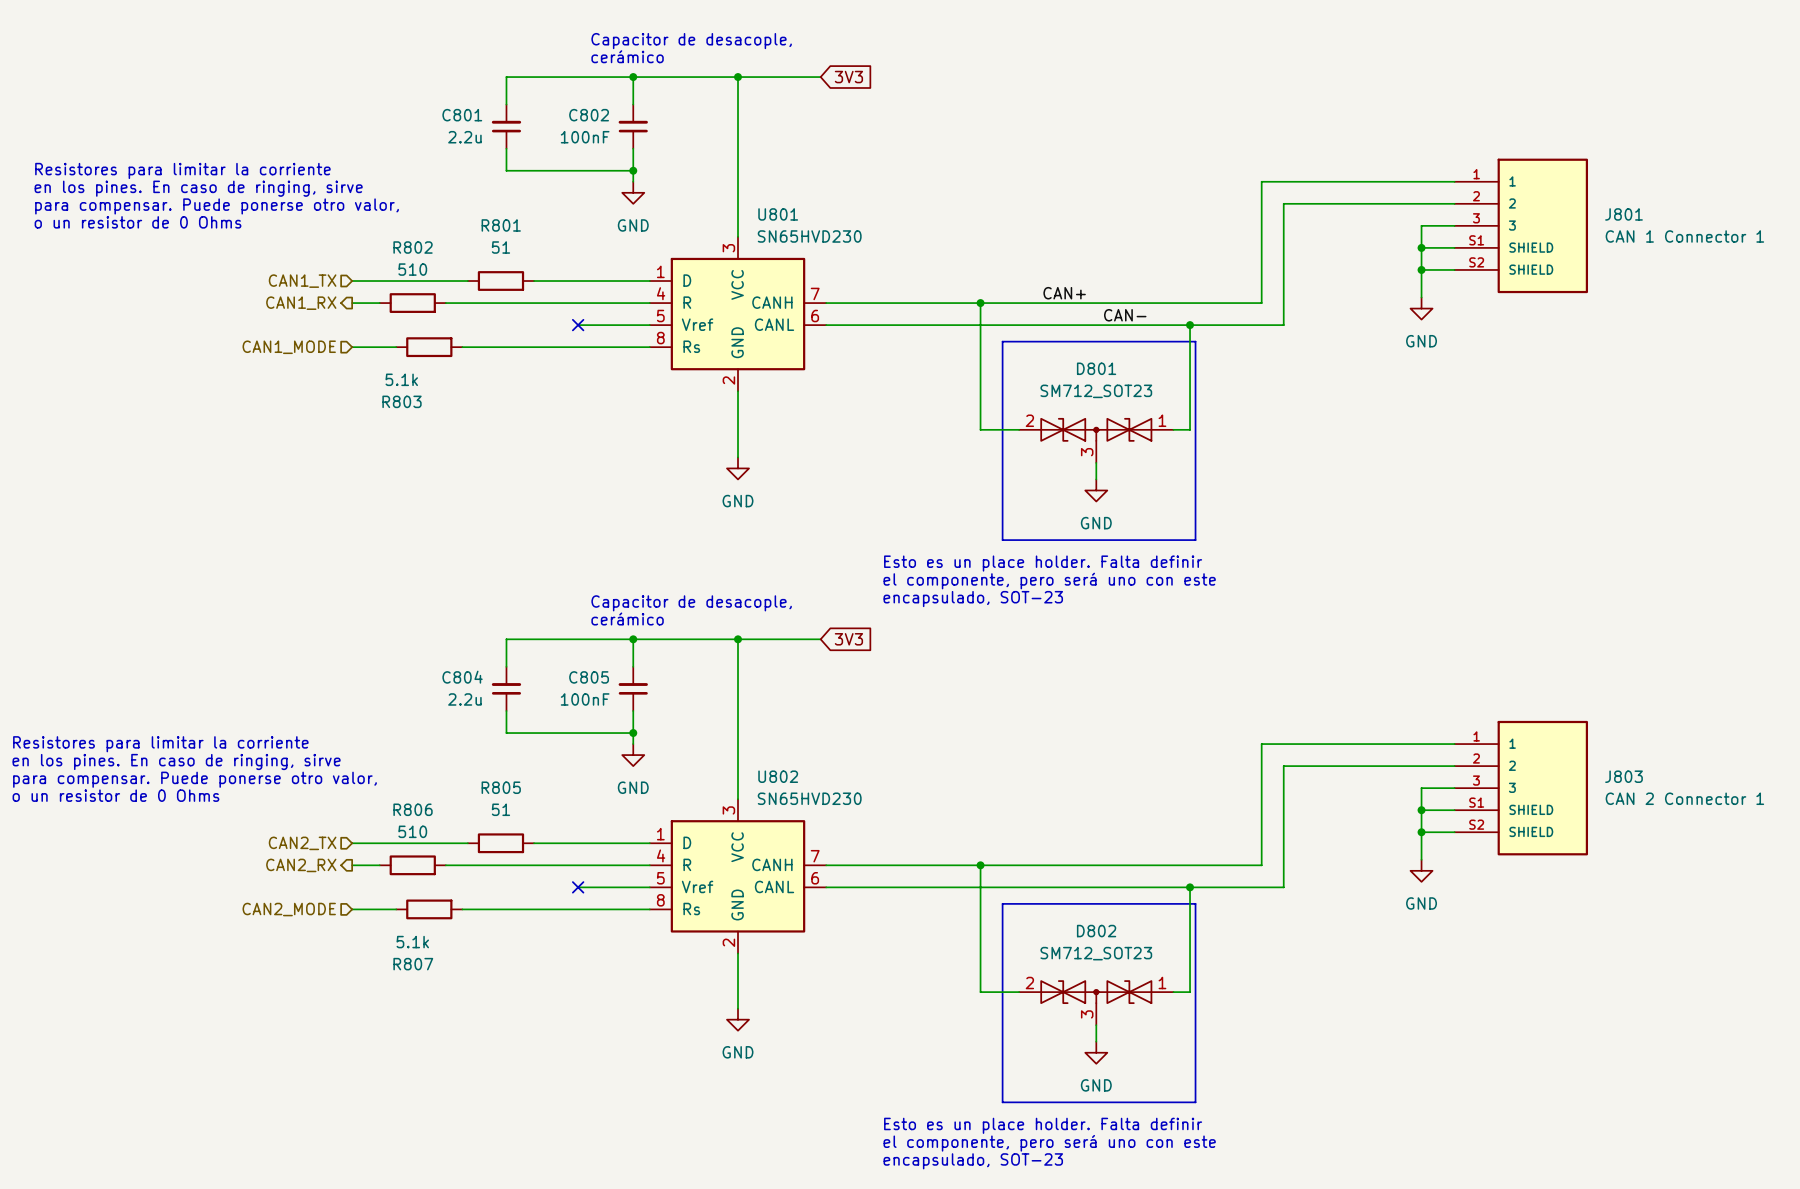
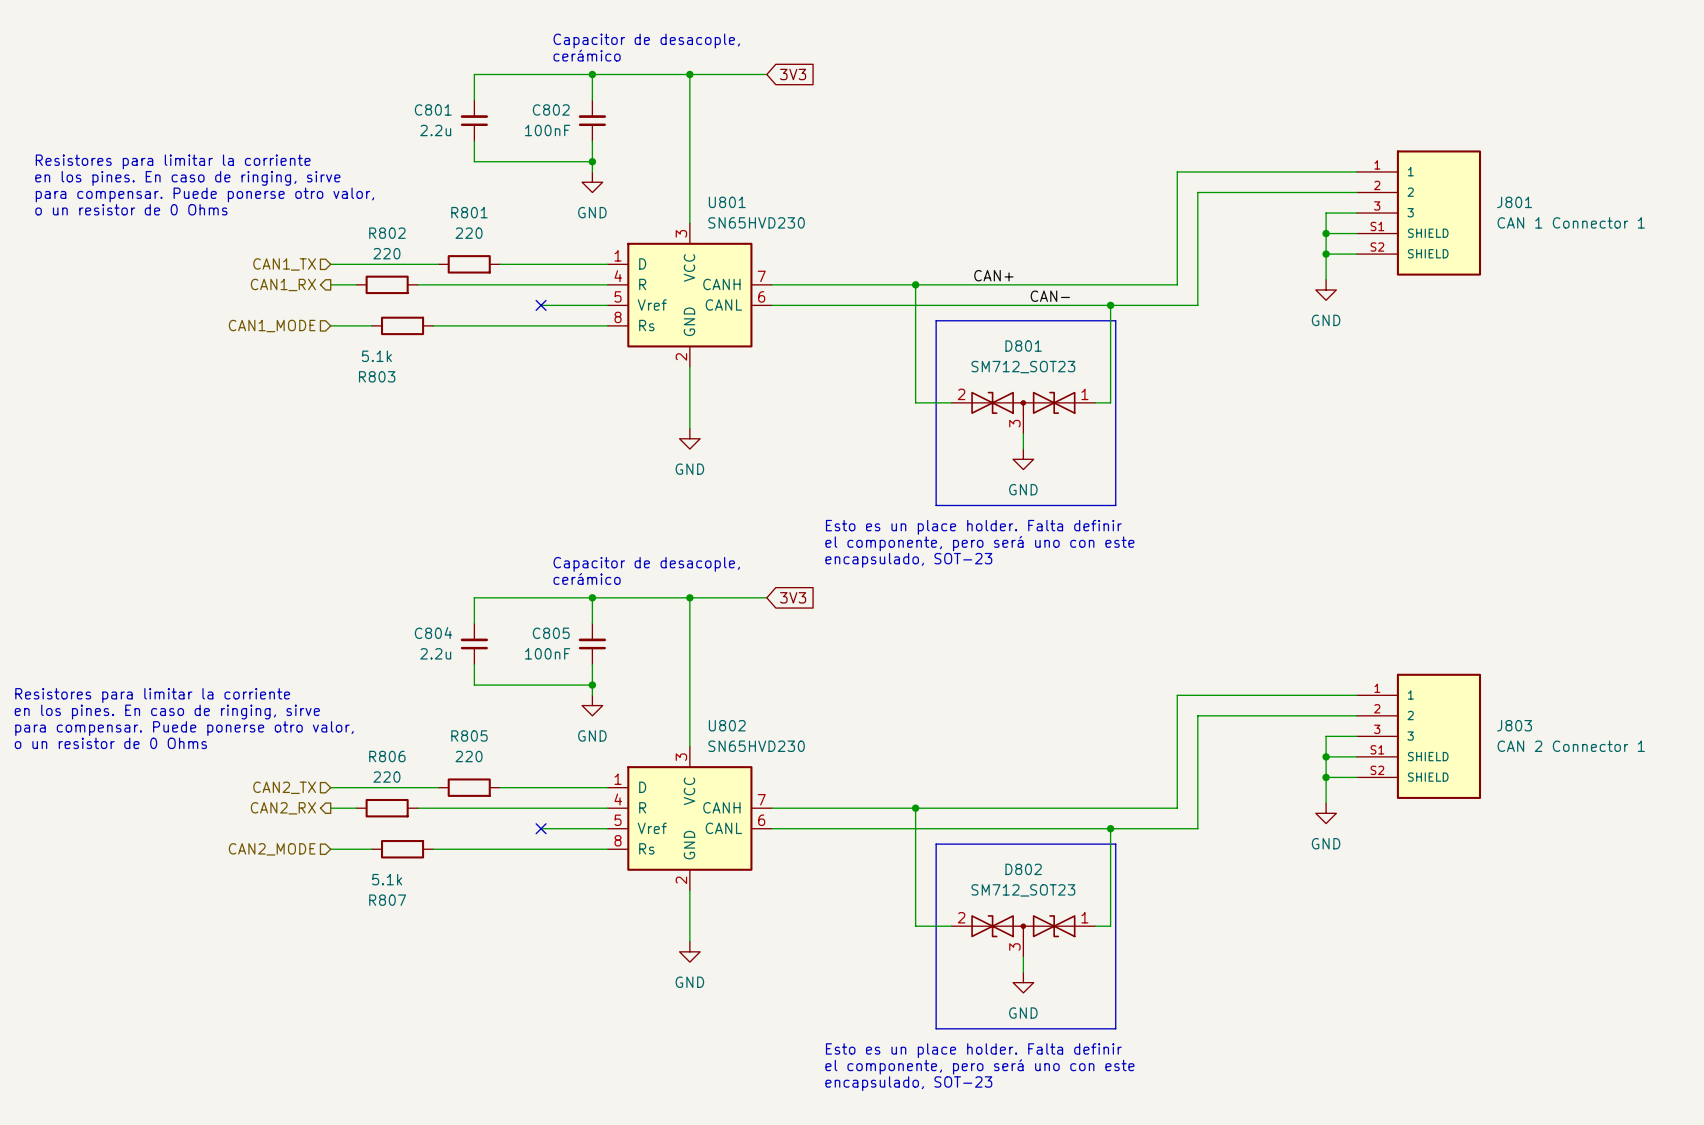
R801 value: 51 (500, 247) -> 220 (469, 233)
R802 value: 510 (412, 269) -> 220 (386, 253)
R805 value: 51 (500, 809) -> 220 (469, 756)
R806 value: 510 (412, 831) -> 220 (386, 777)

